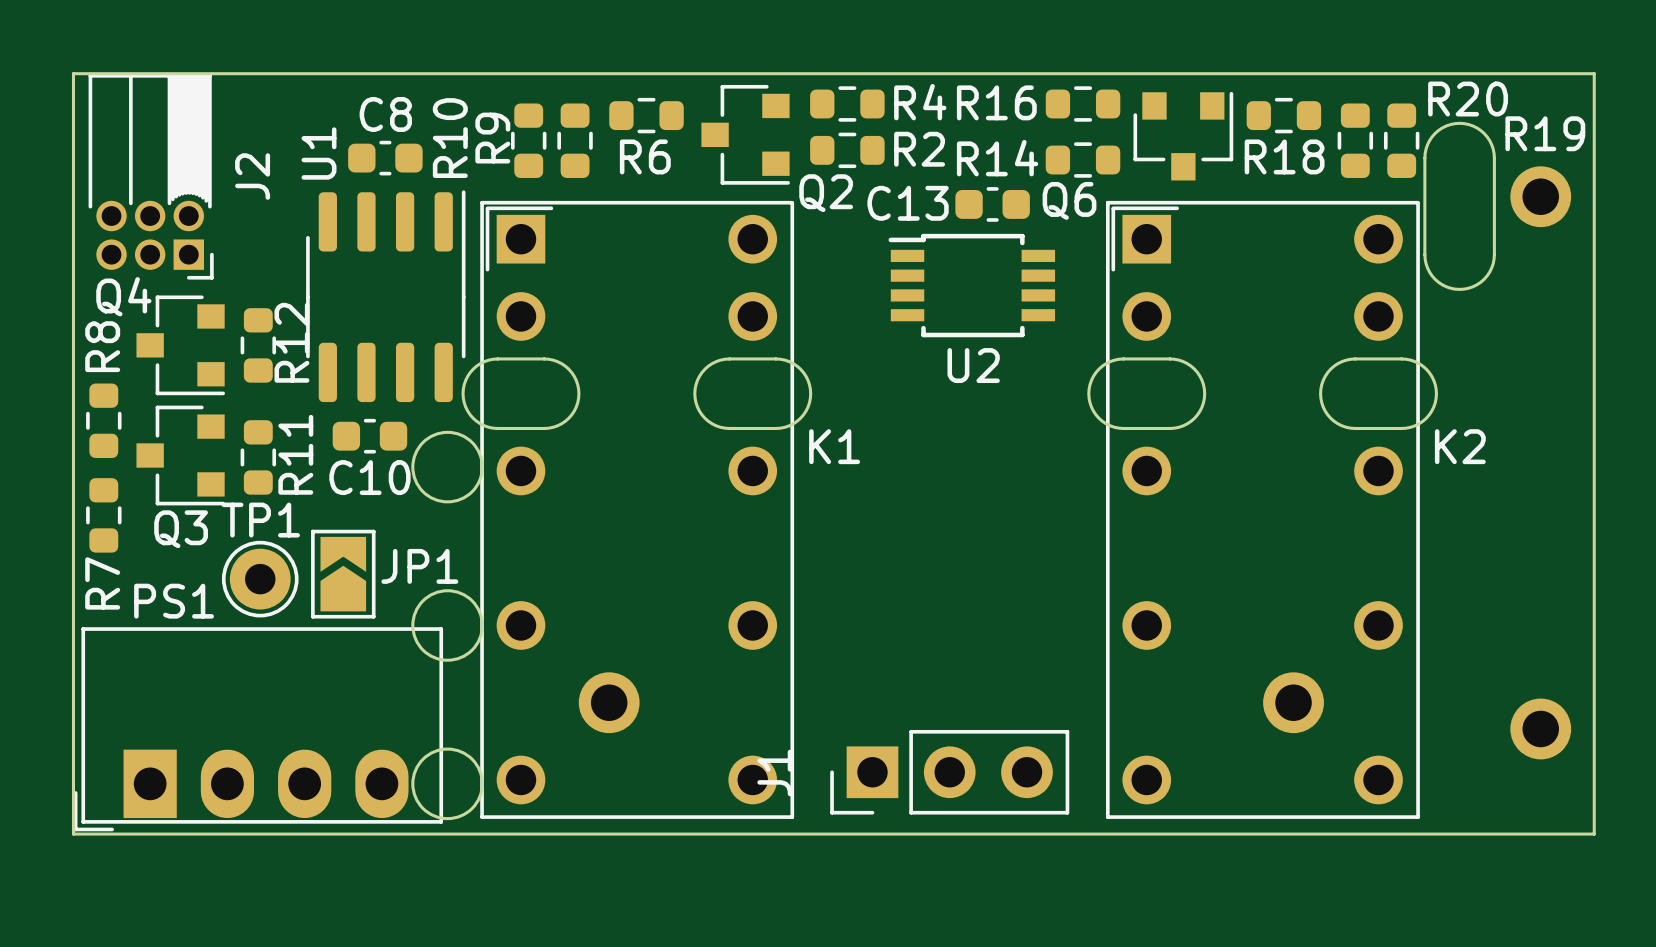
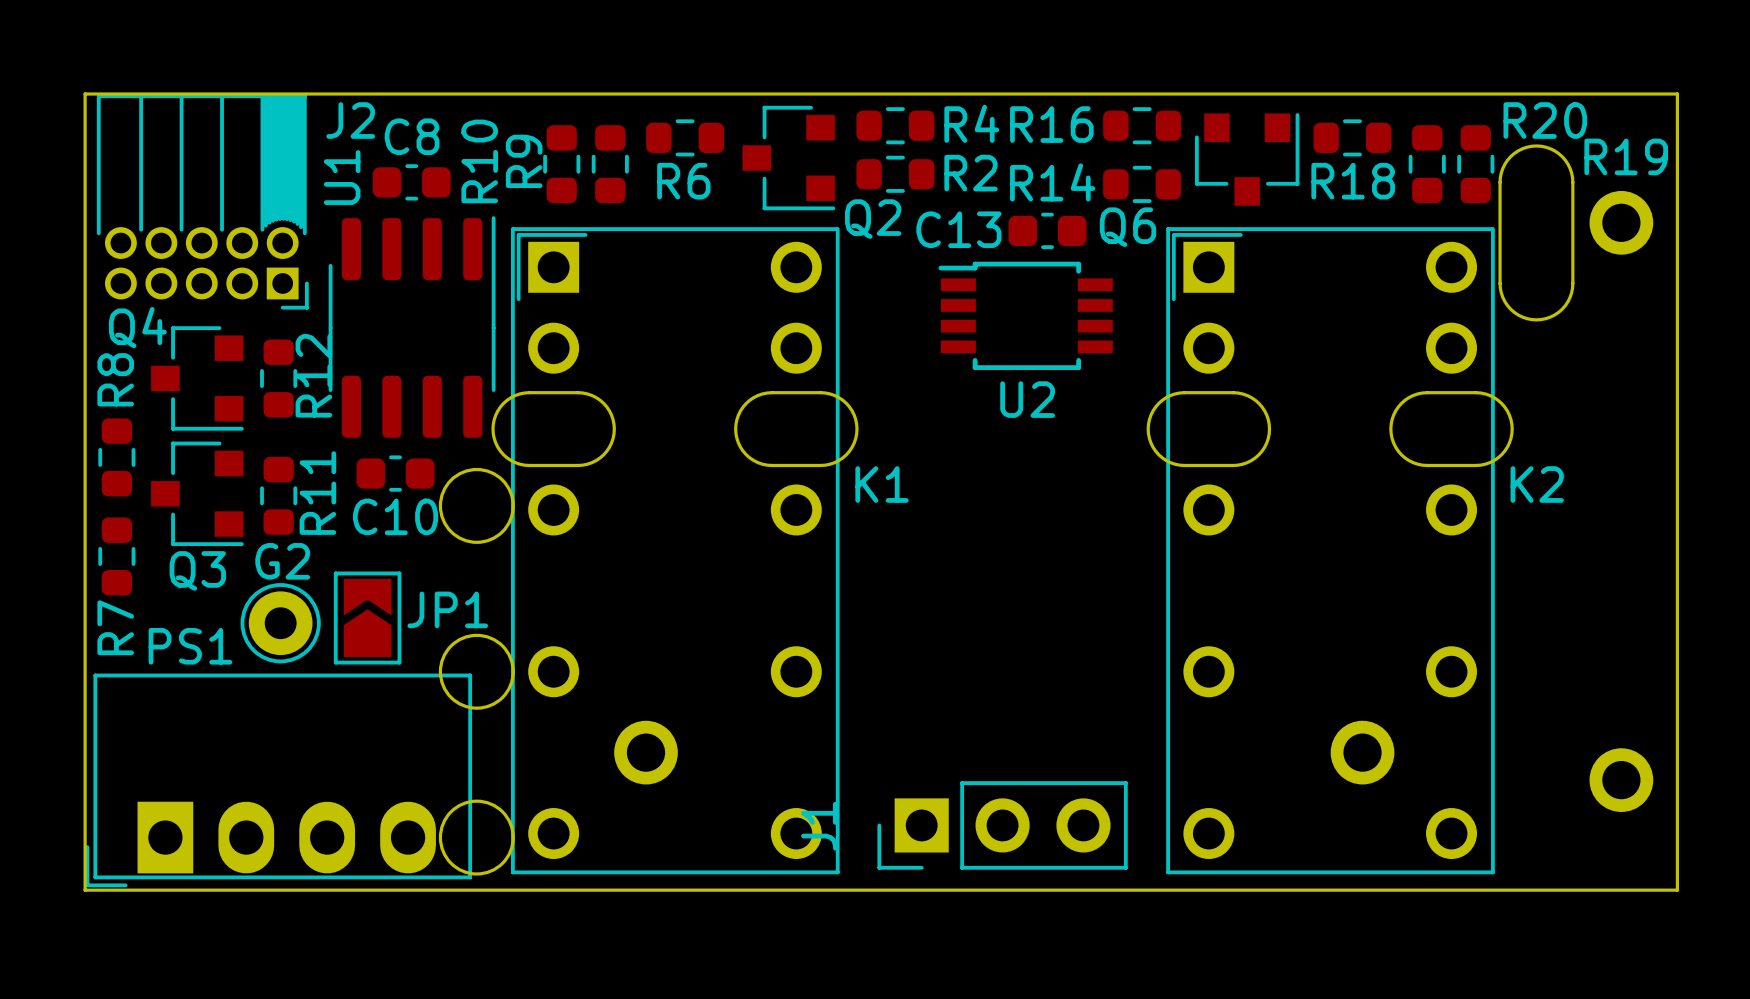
J2 footprint: [88, 73, 214, 280] -> [96, 94, 309, 310]
J2 name position: J2 (252, 176) -> J2 (350, 120)
TP1 name: TP1 (260, 520) -> G2 (282, 561)

